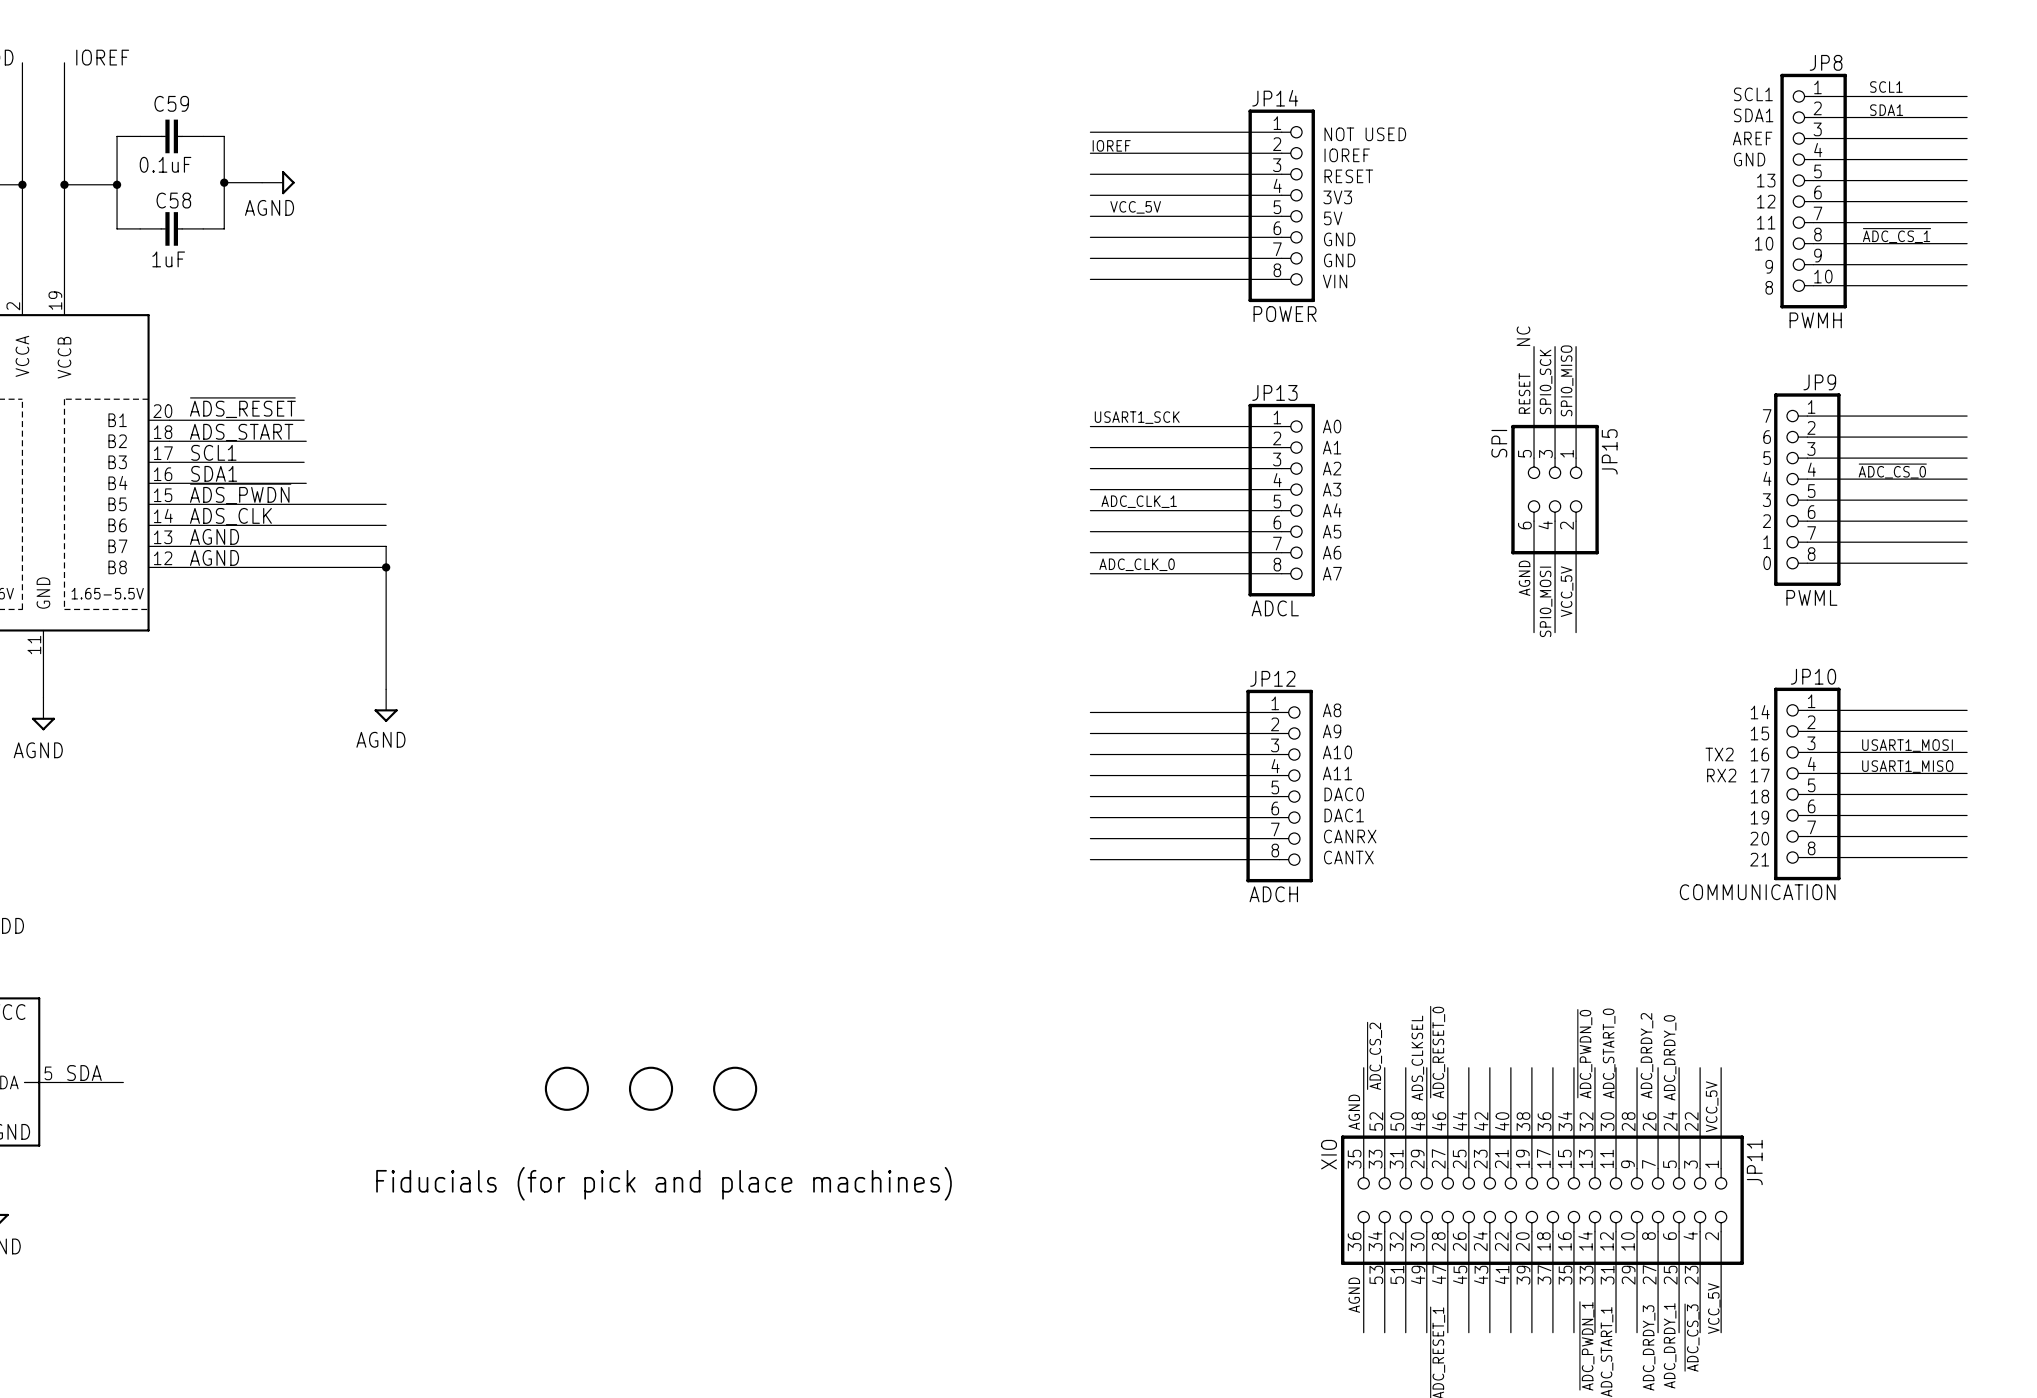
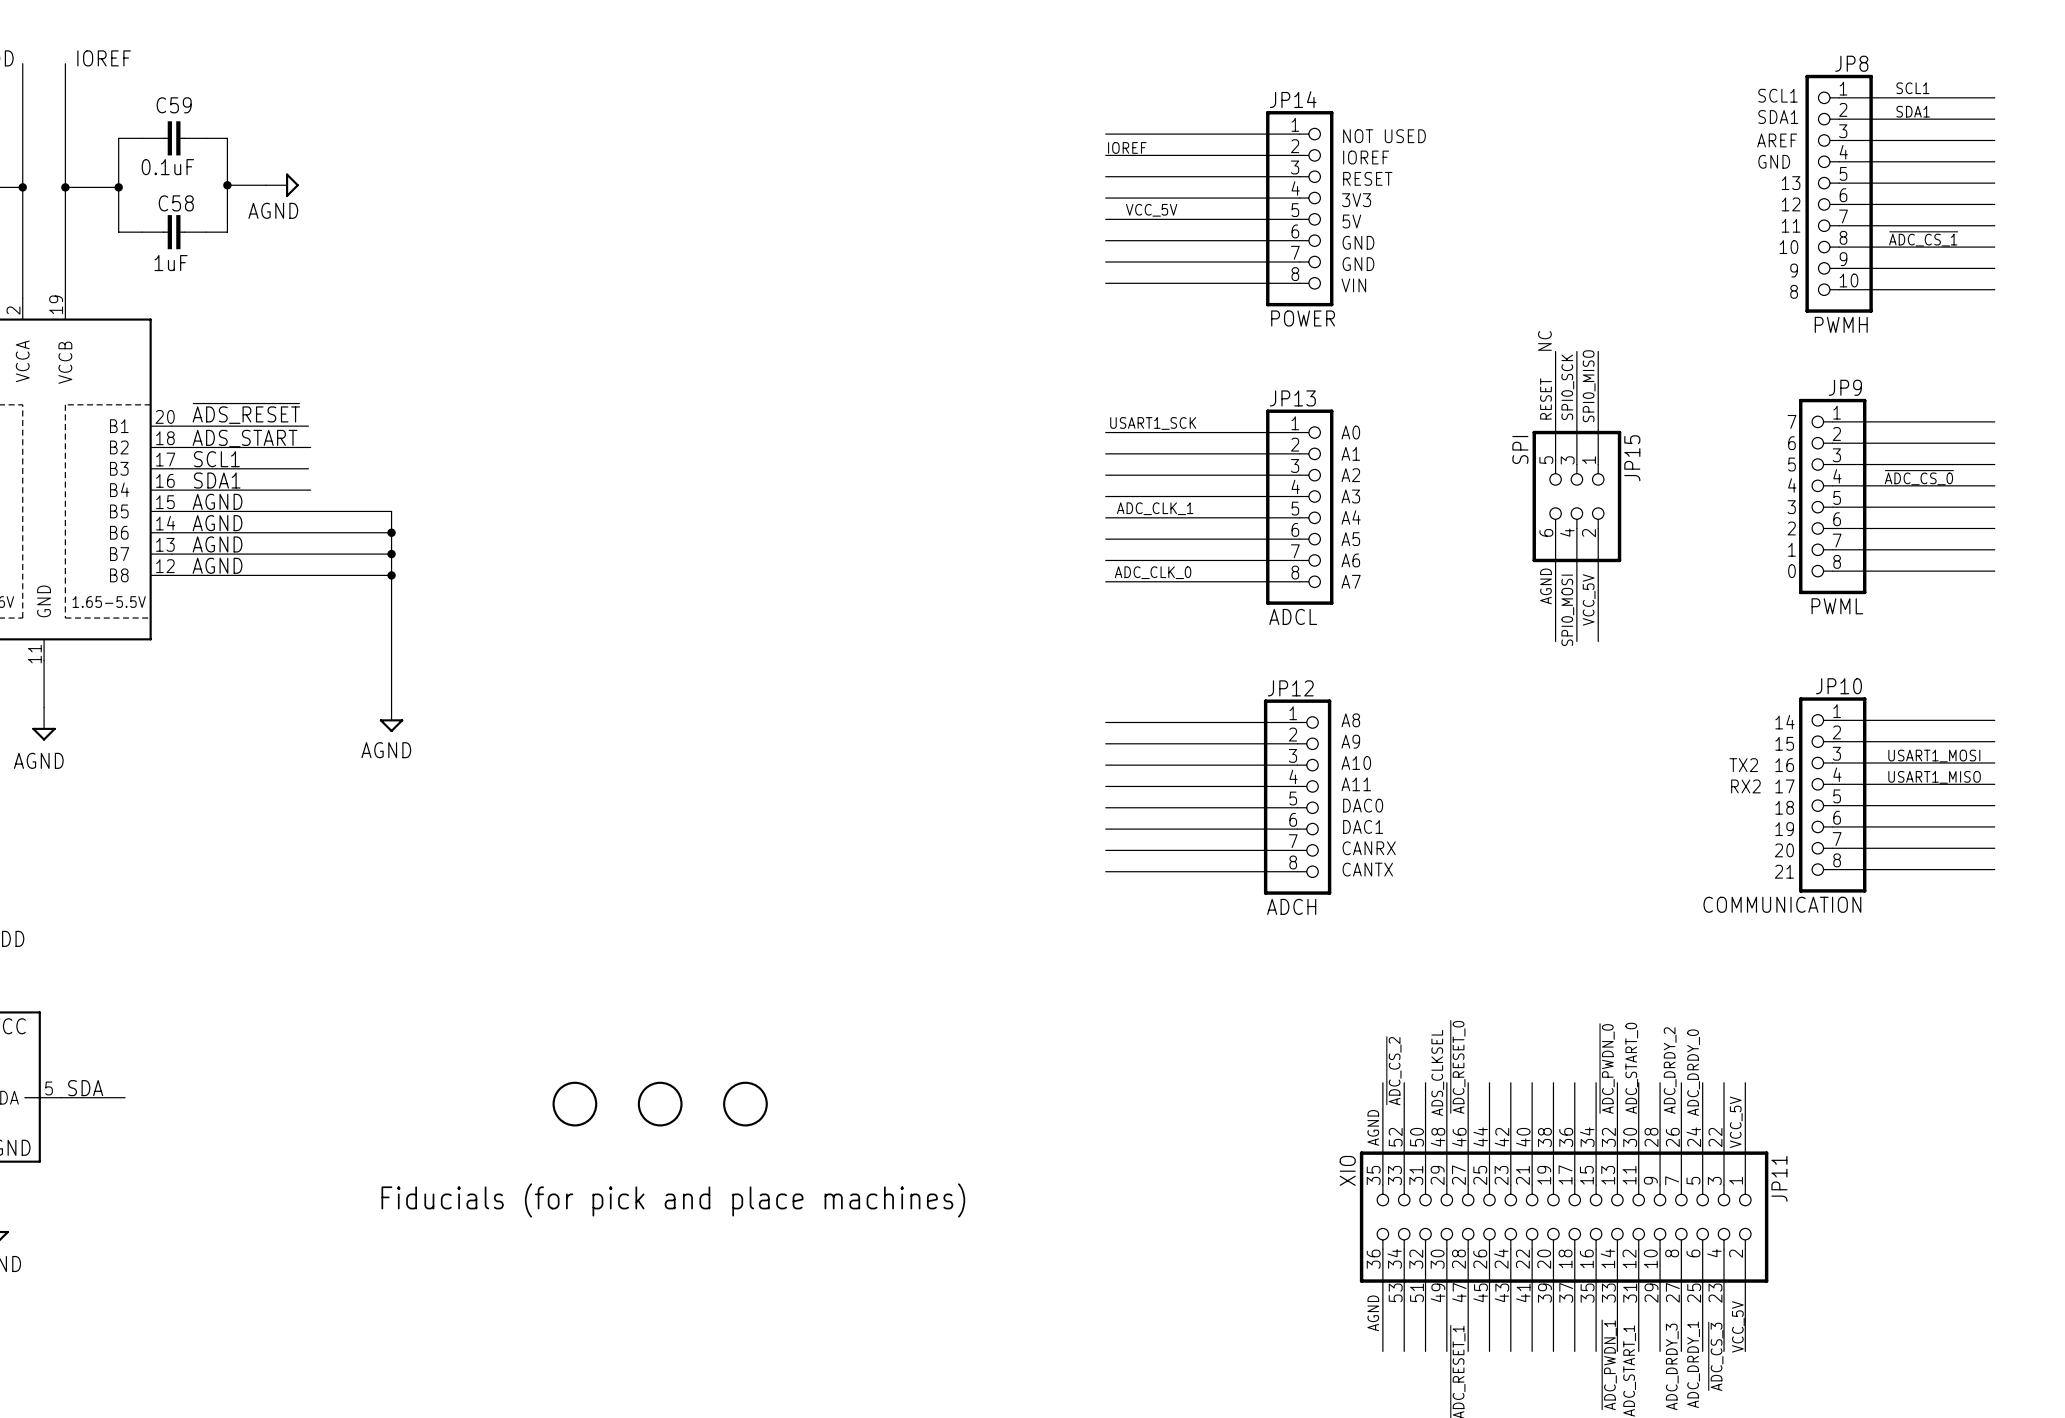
label: ~{ADS_PWDN} (240, 493) -> AGND (217, 501)
wire: none -> (391, 511) (391, 554)
label: ADS_CLK (230, 516) -> AGND (217, 523)
junction: none -> (391, 532)
junction: none -> (391, 554)

